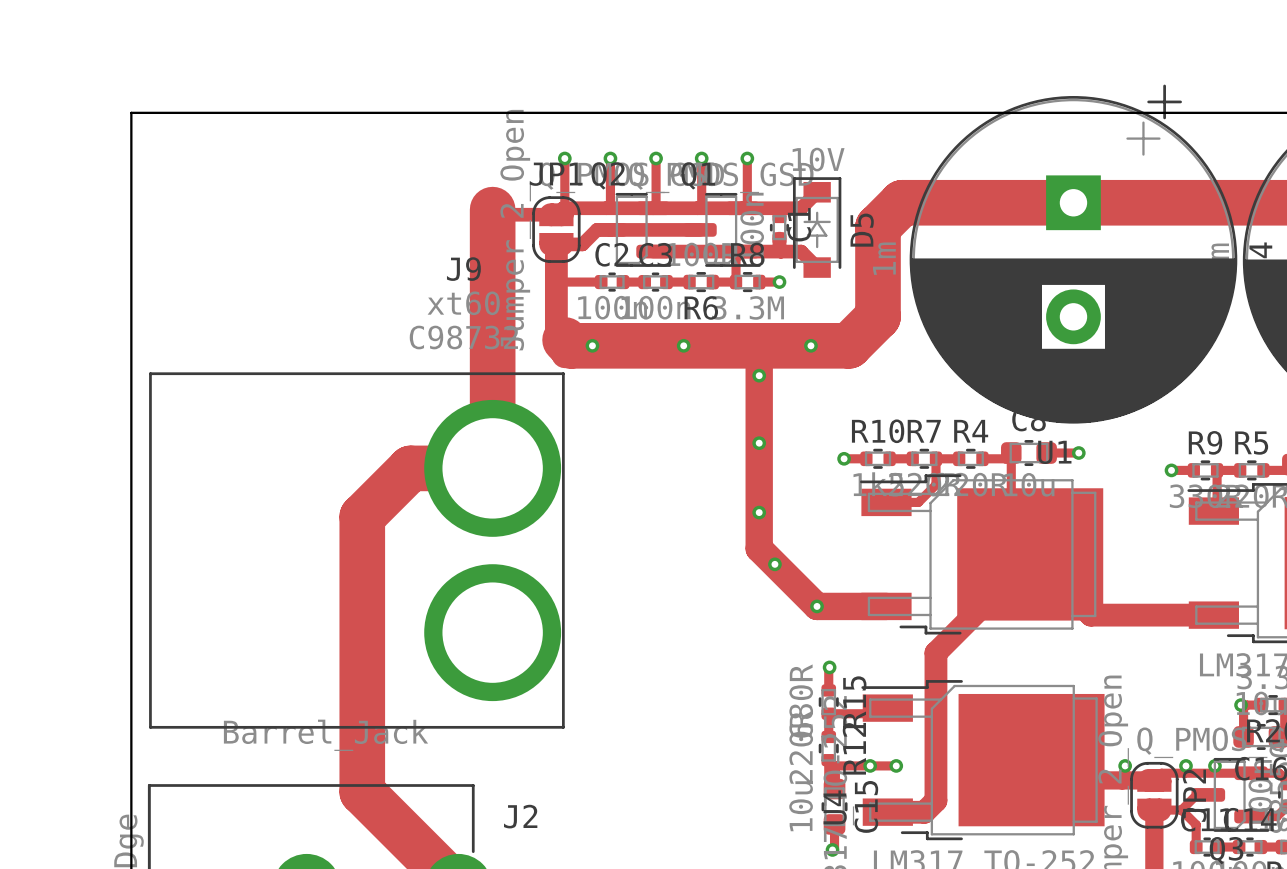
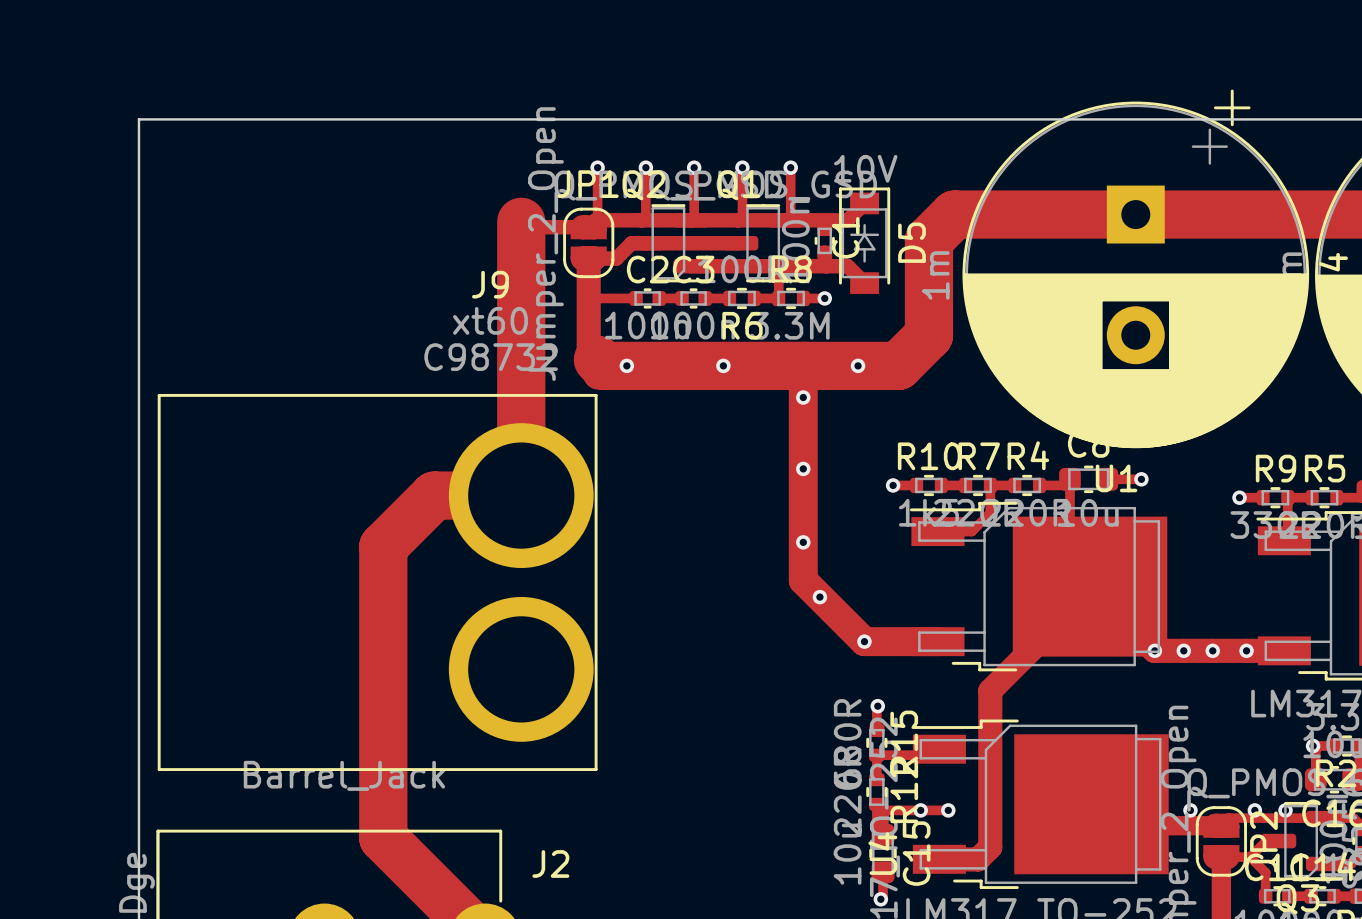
via: none -> (1154, 650)
via: none -> (1183, 650)
via: none -> (1212, 650)
via: none -> (1246, 650)

